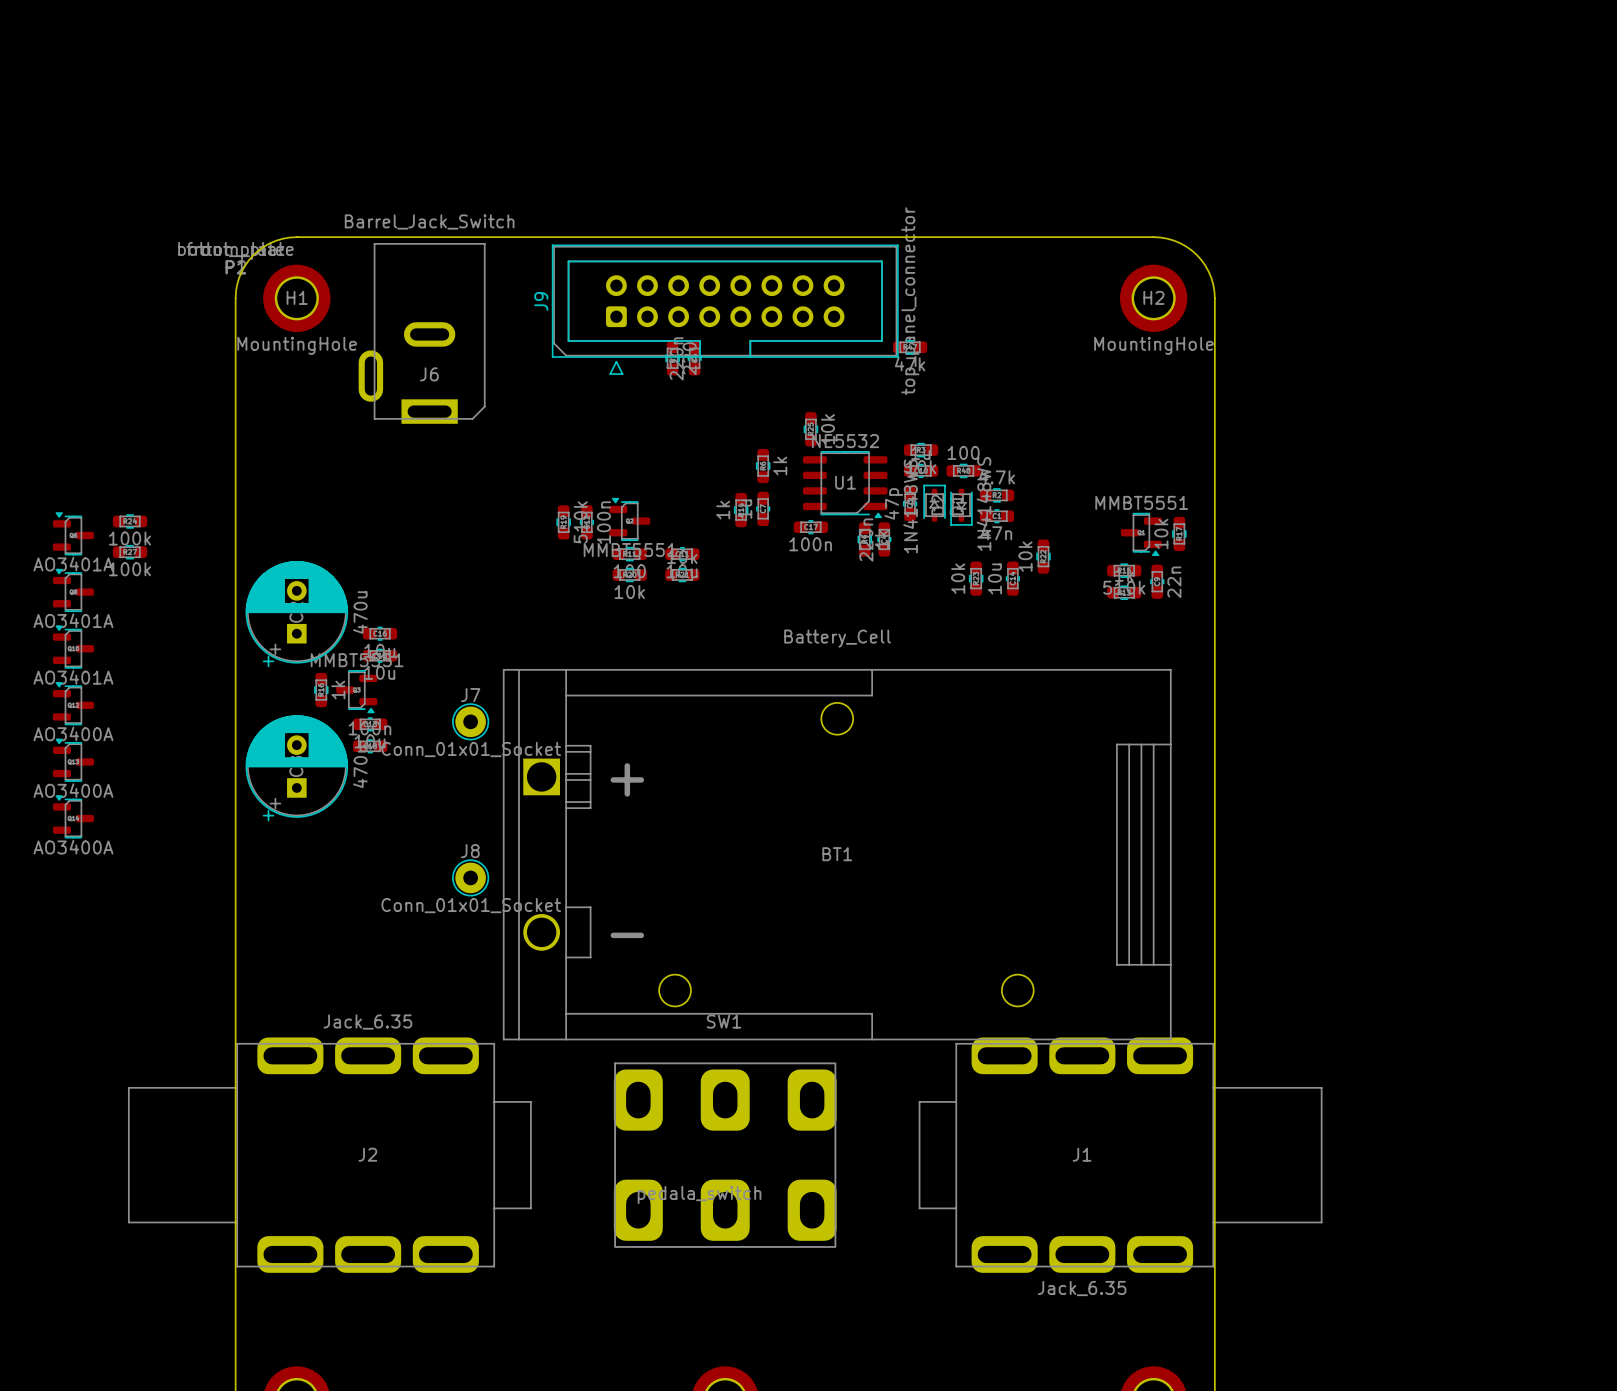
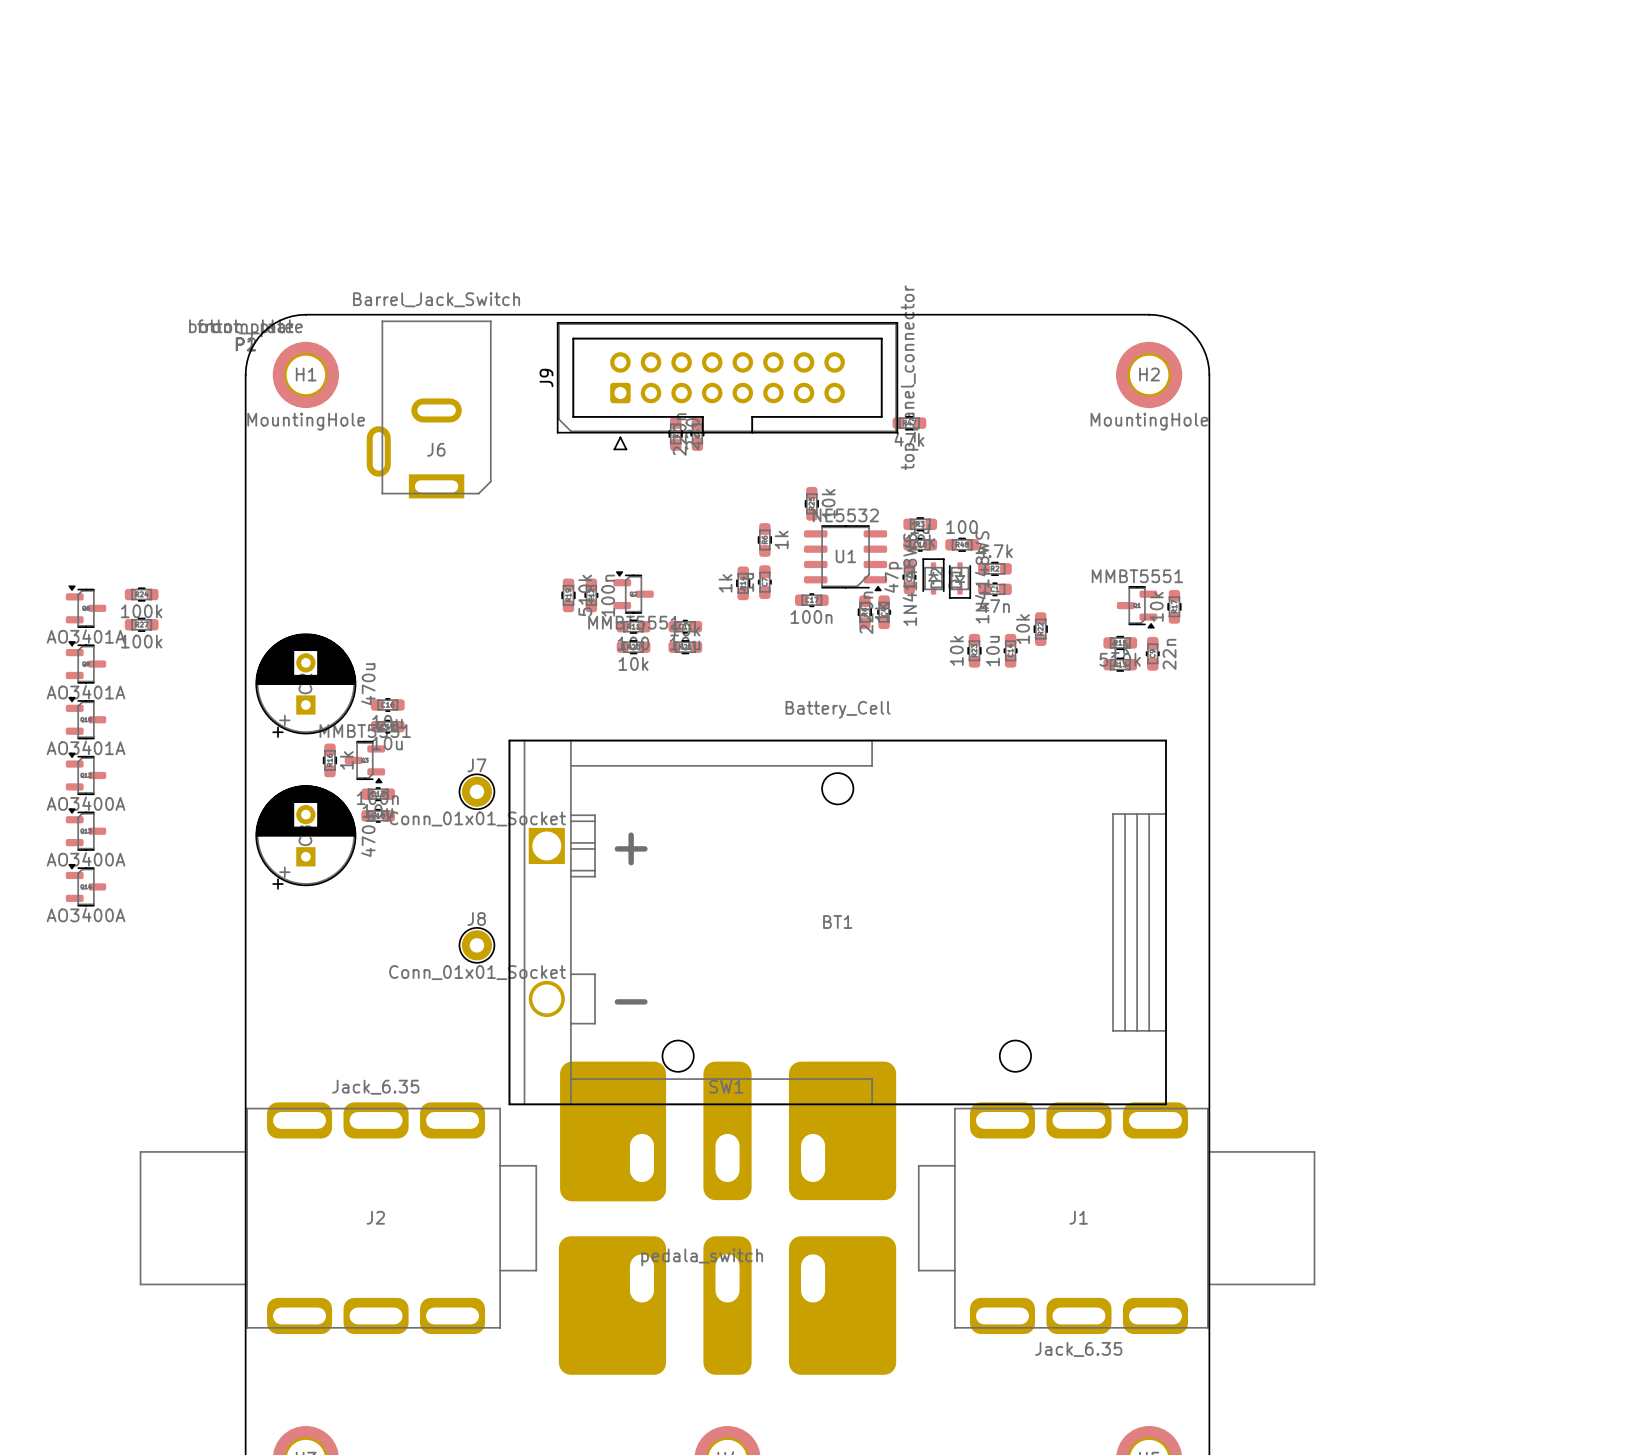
BT1 footprint: [503, 669, 1172, 1041] -> [508, 739, 1167, 1106]
SW1 footprint: [613, 1062, 837, 1248] -> [558, 1061, 897, 1375]

